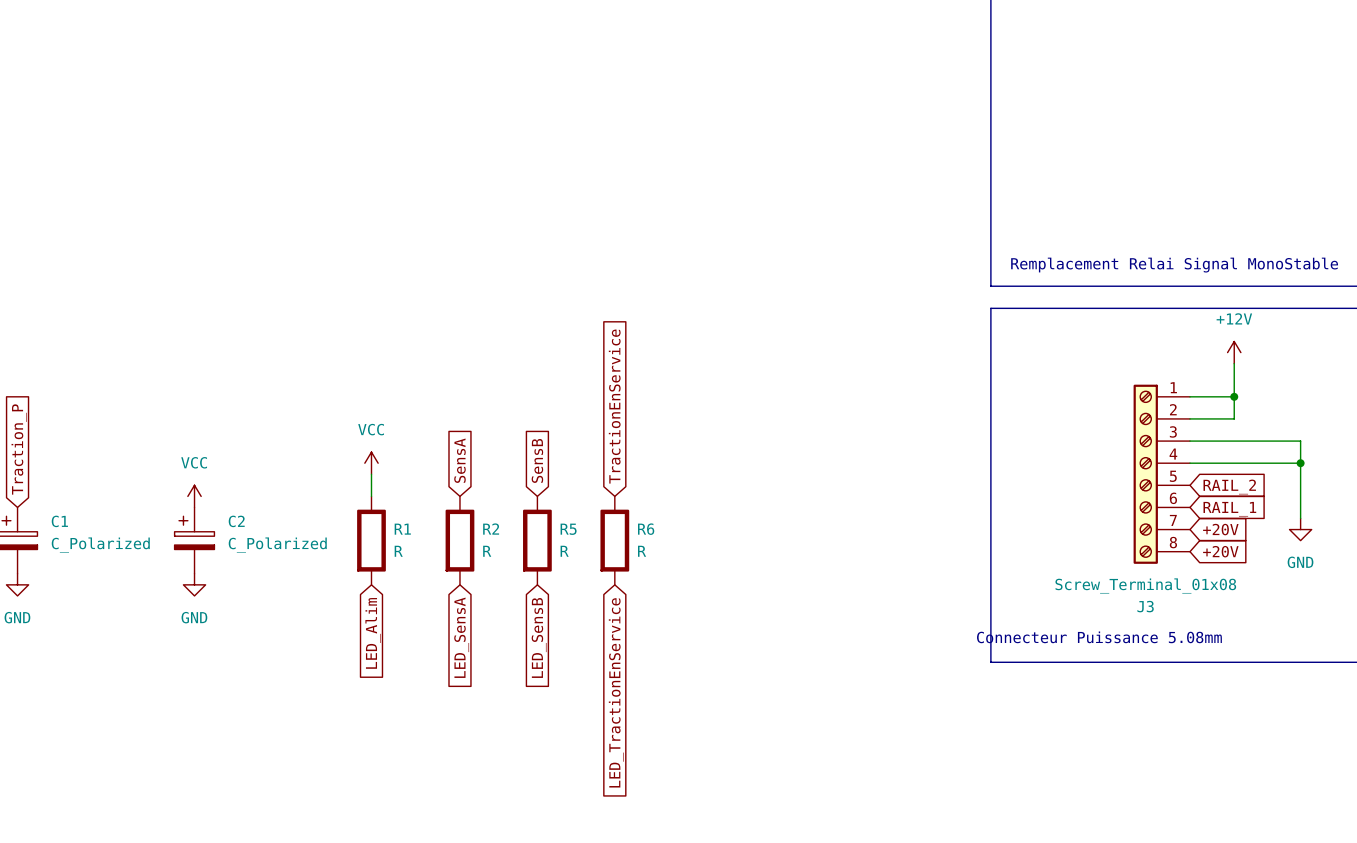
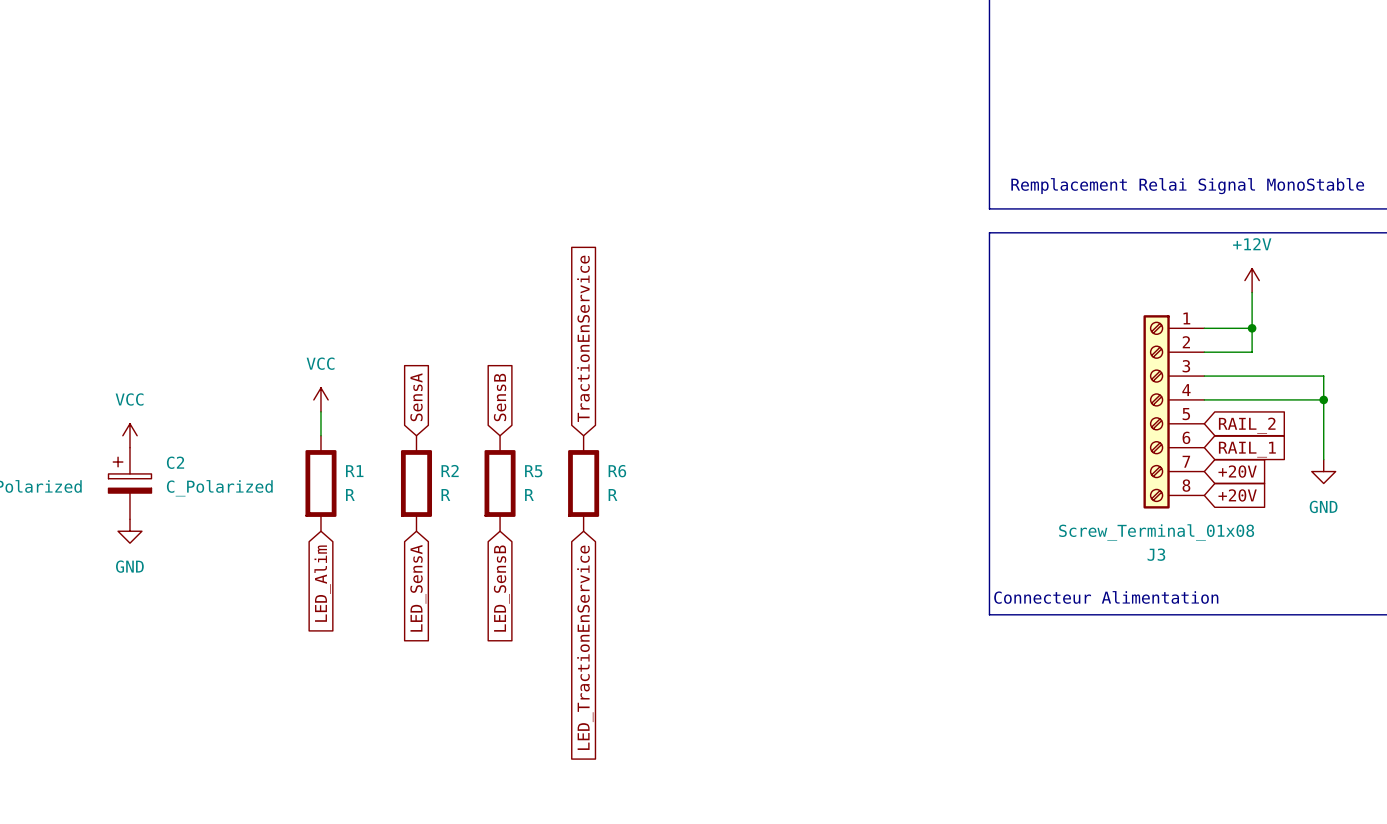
text: Connecteur Puissance 5.08mm (1099, 637) -> none
text: none -> Connecteur Alimentation (1106, 597)

